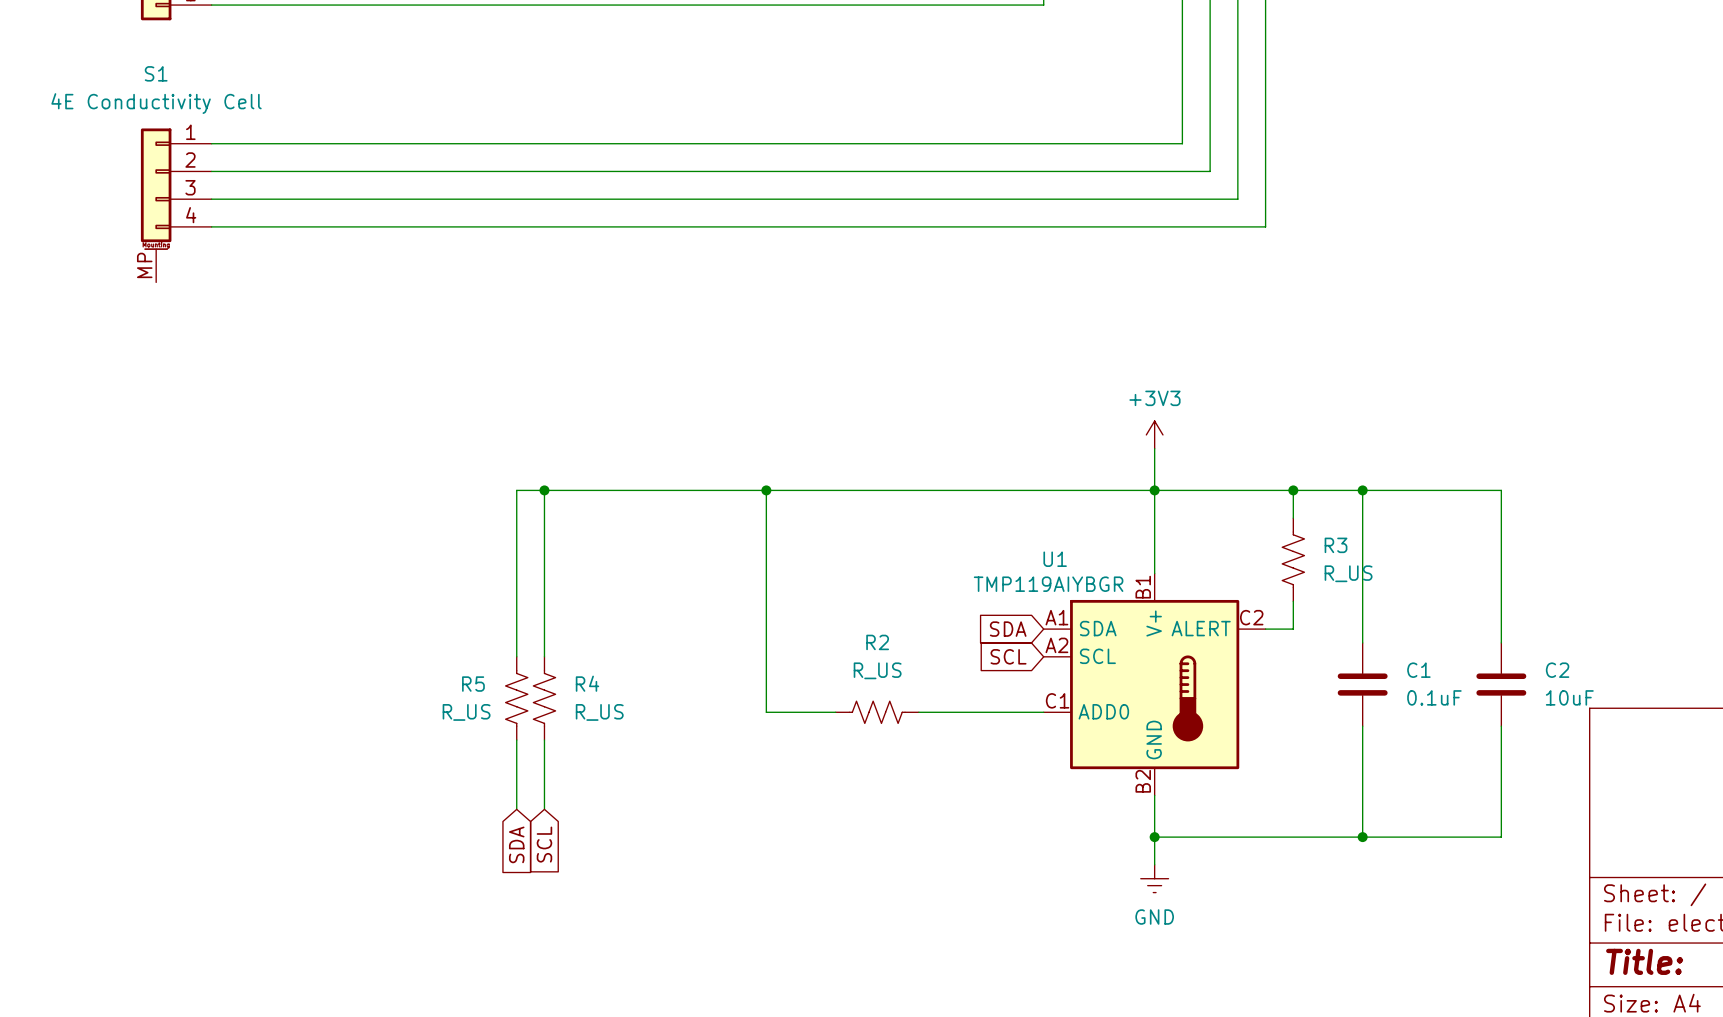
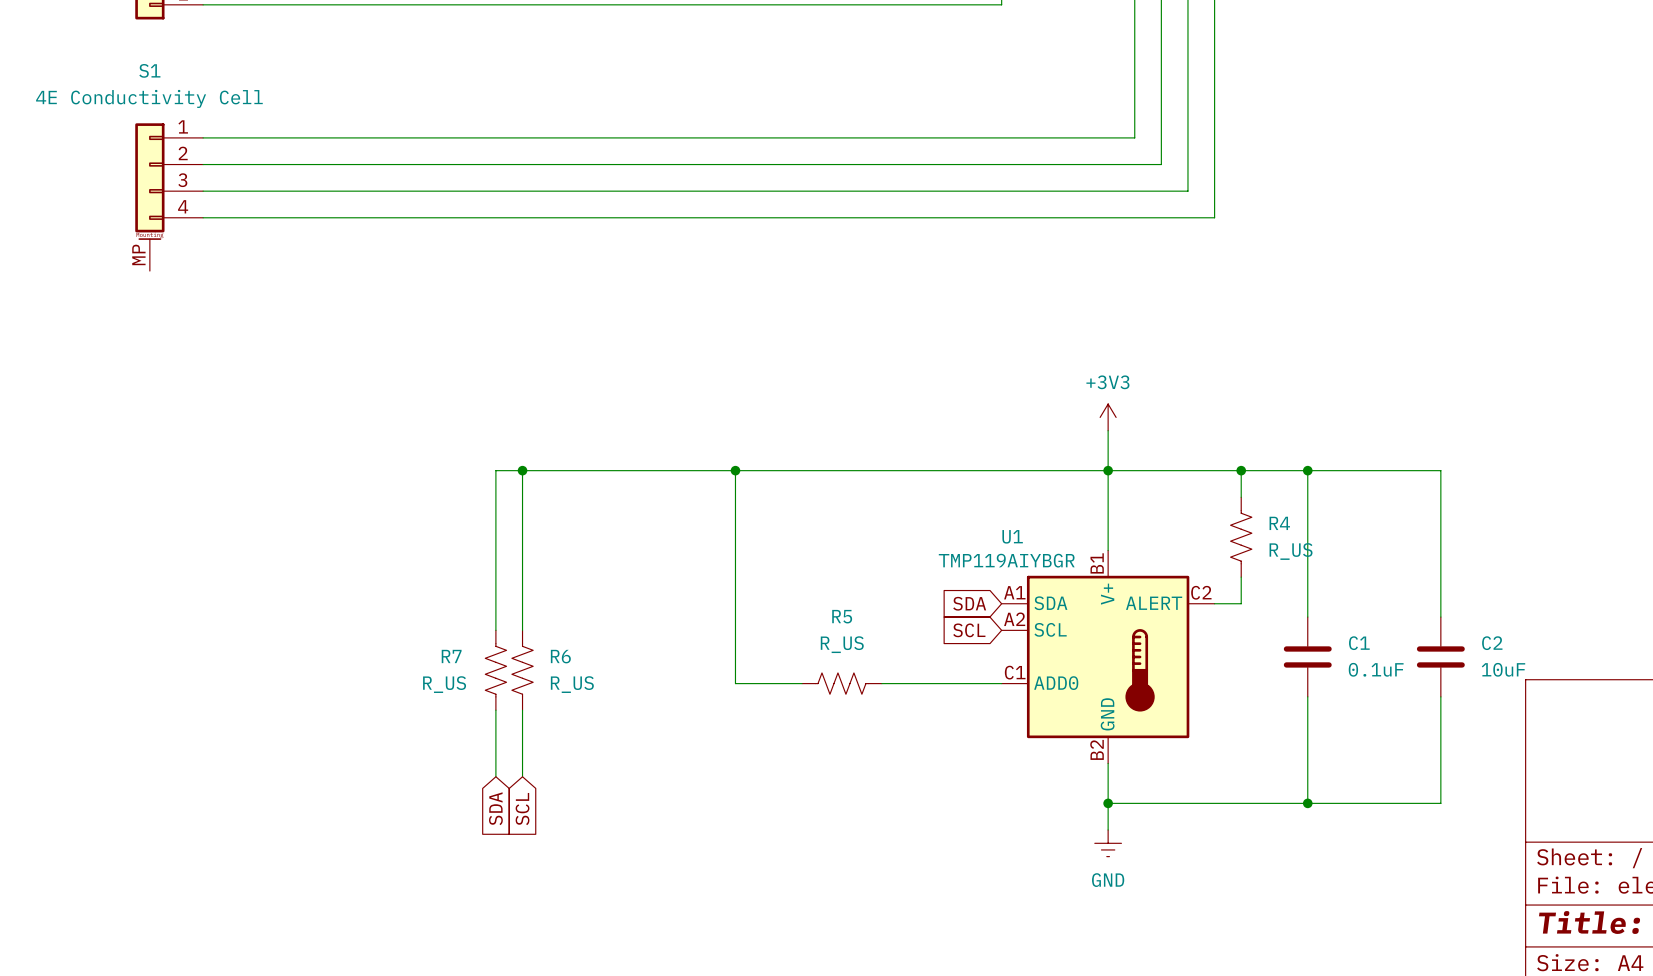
R3 name: R3 (1336, 545) -> R4 (1279, 523)
R2 name: R2 (877, 642) -> R5 (842, 616)
R4 name: R4 (587, 683) -> R6 (560, 656)
R5 name: R5 (473, 684) -> R7 (451, 656)

